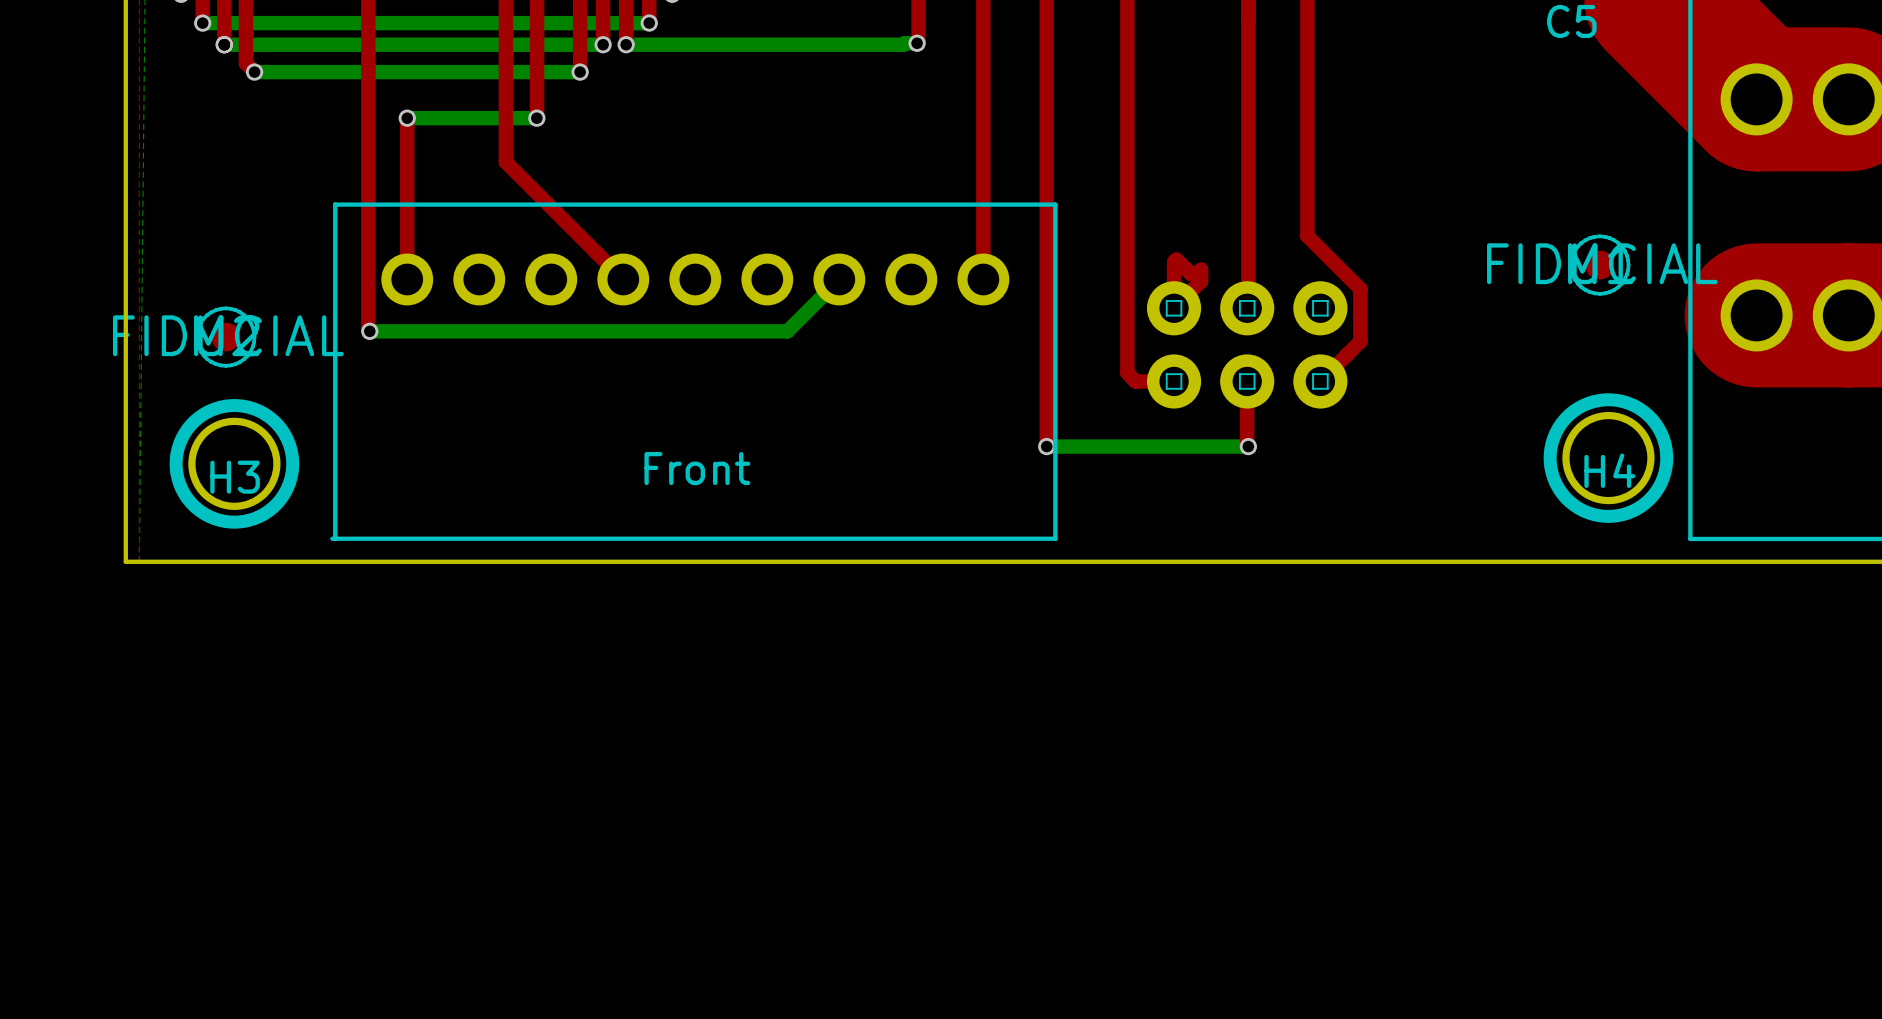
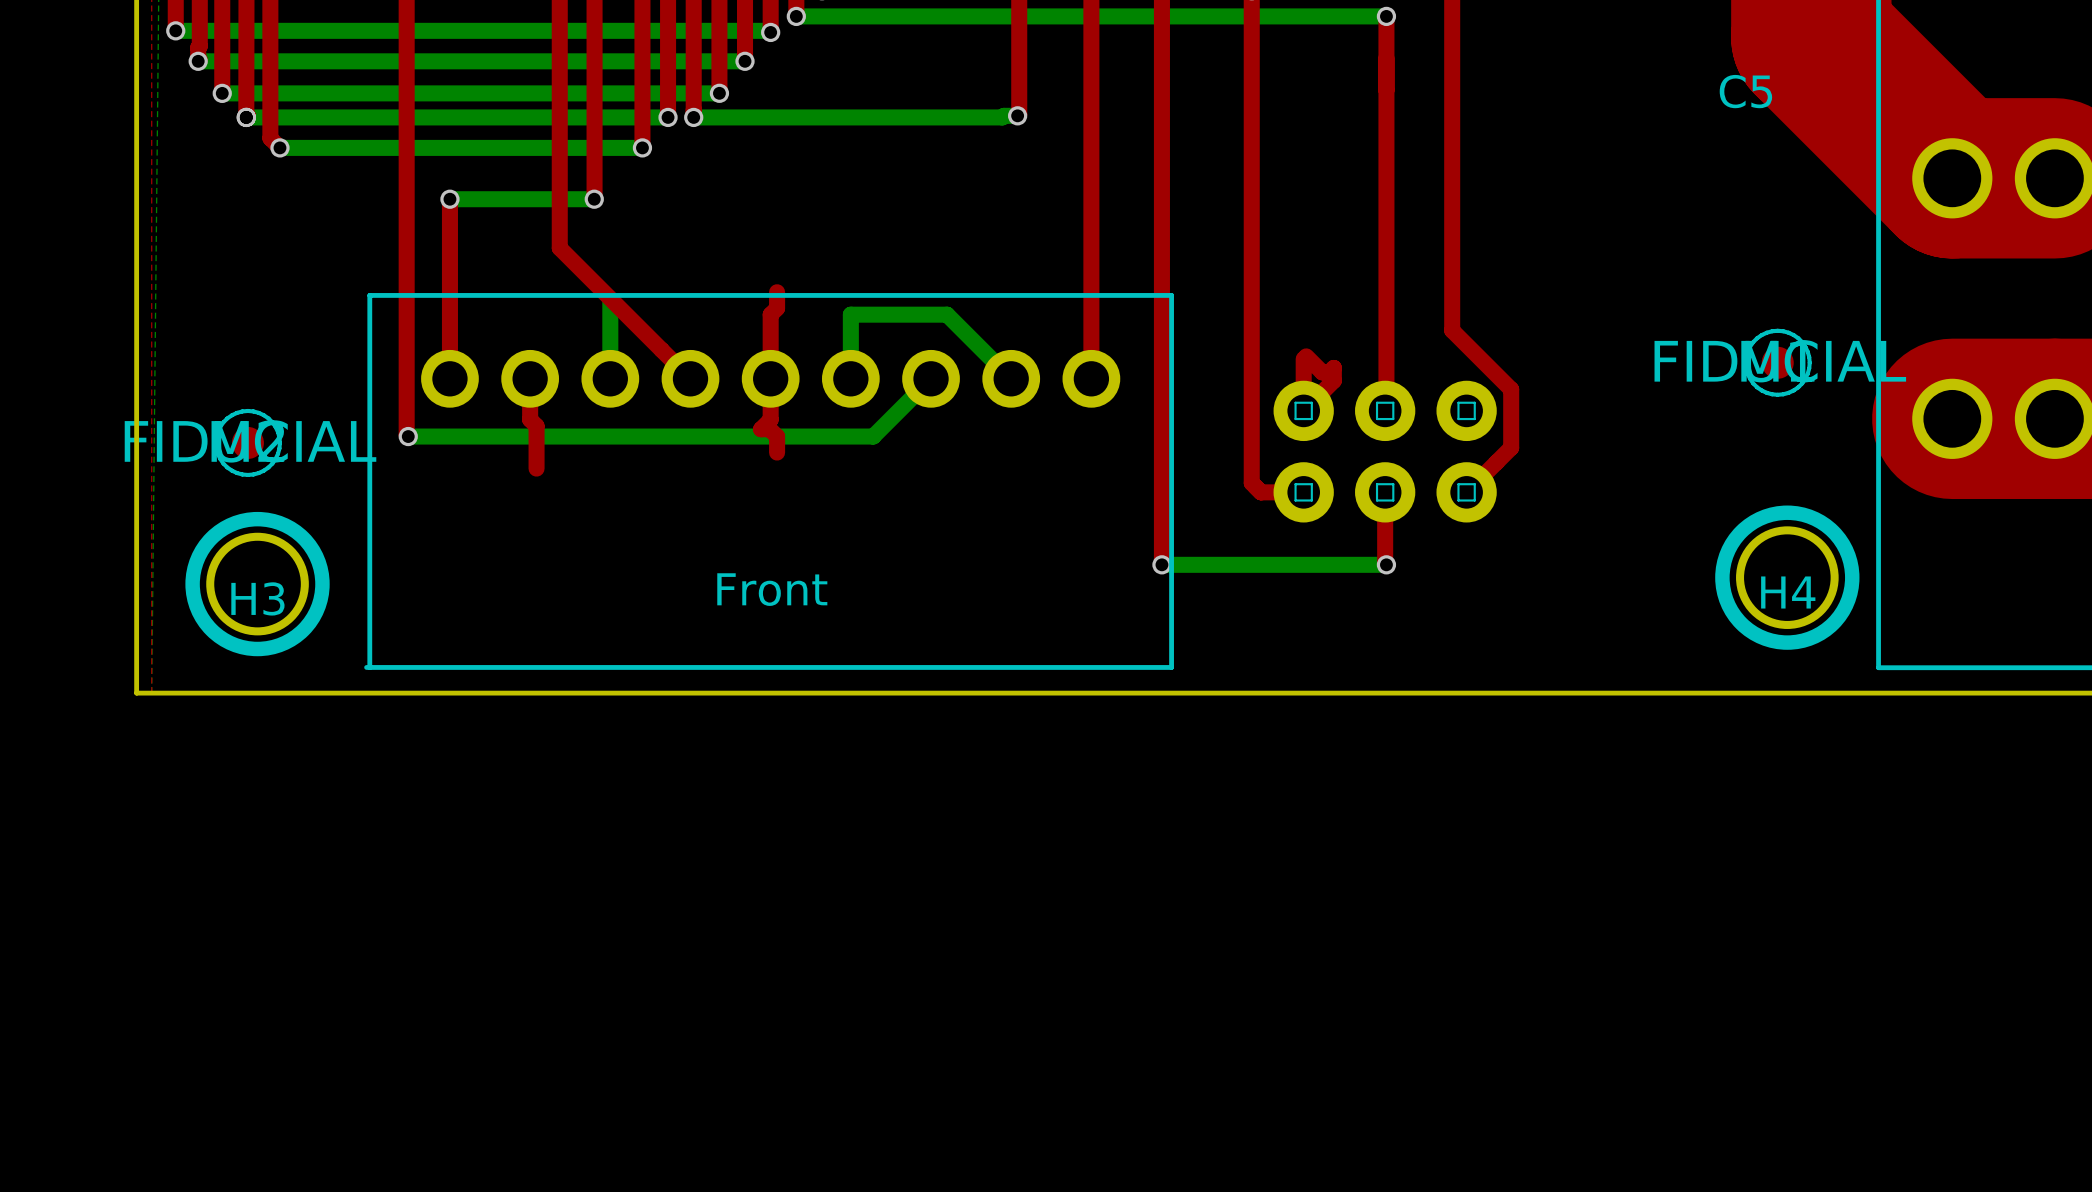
top track: none -> (777, 292) (777, 308) (770, 314) (770, 419) (761, 429) (769, 429) (777, 436) (777, 452)
bottom track: none -> (610, 301) (610, 378)
top track: none -> (530, 378) (530, 419) (536, 426) (536, 468)
bottom track: none -> (850, 378) (850, 314) (947, 314) (1011, 378)

